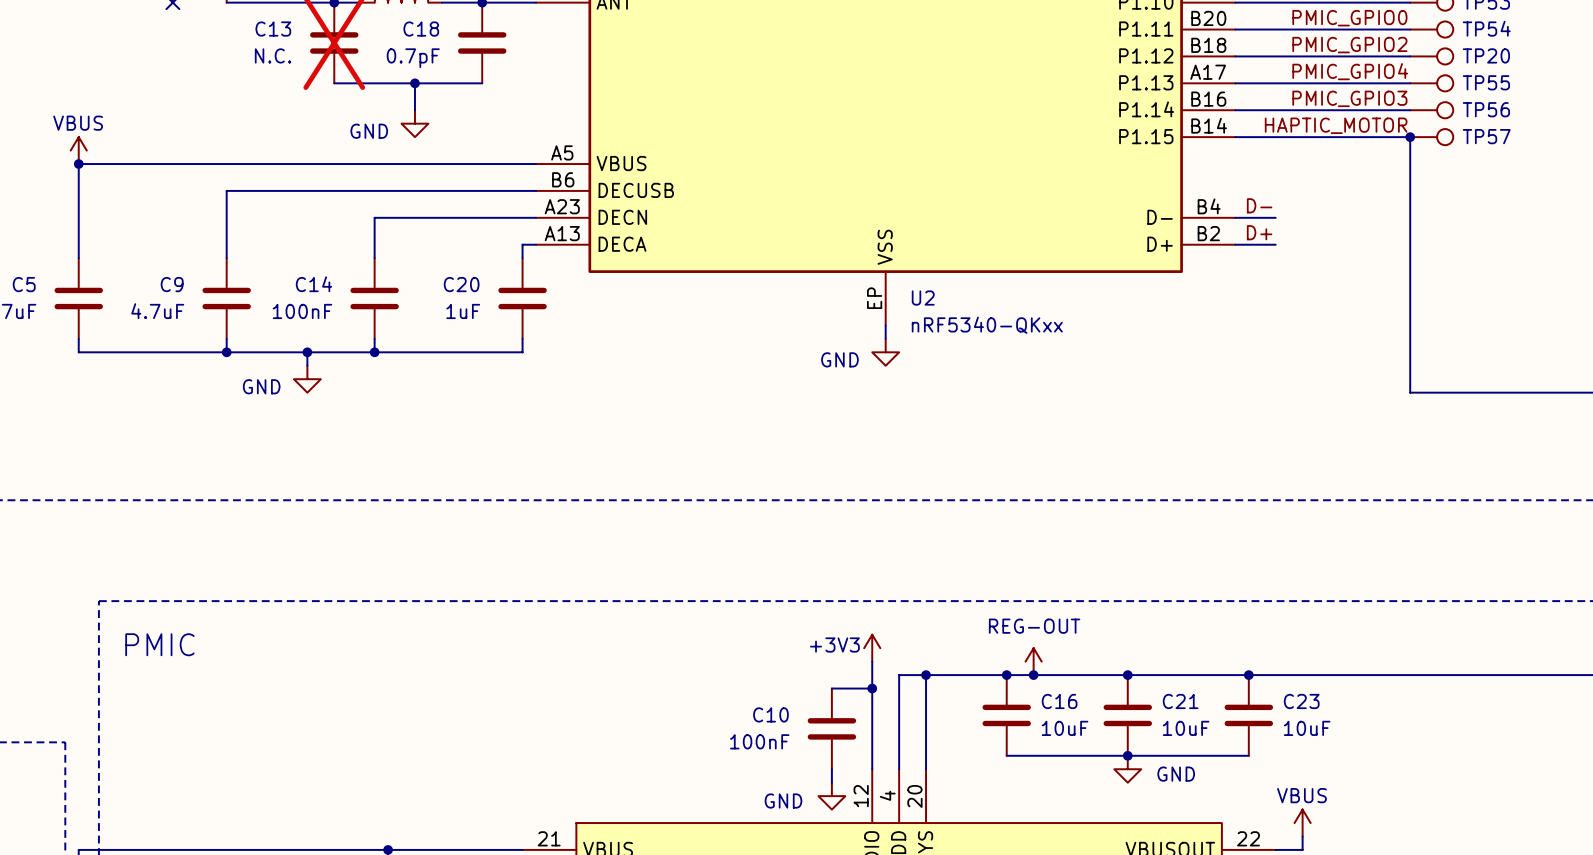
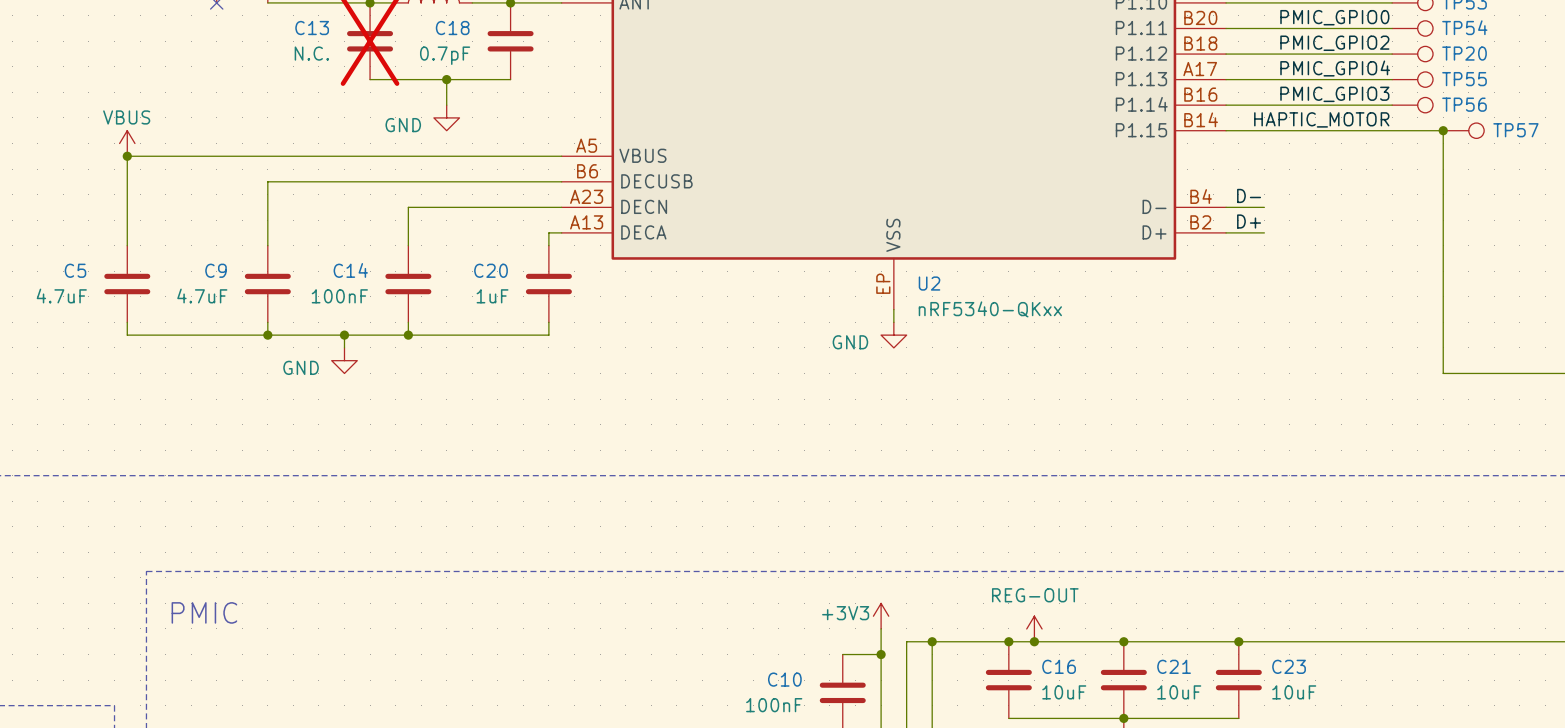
wire: (1410, 137) (1410, 392) (1464, 392) -> (1392, 130) (1443, 130) (1443, 373)
junction position: (1410, 137) -> (1443, 130)
TP57 position: (1431, 137) -> (1463, 130)

